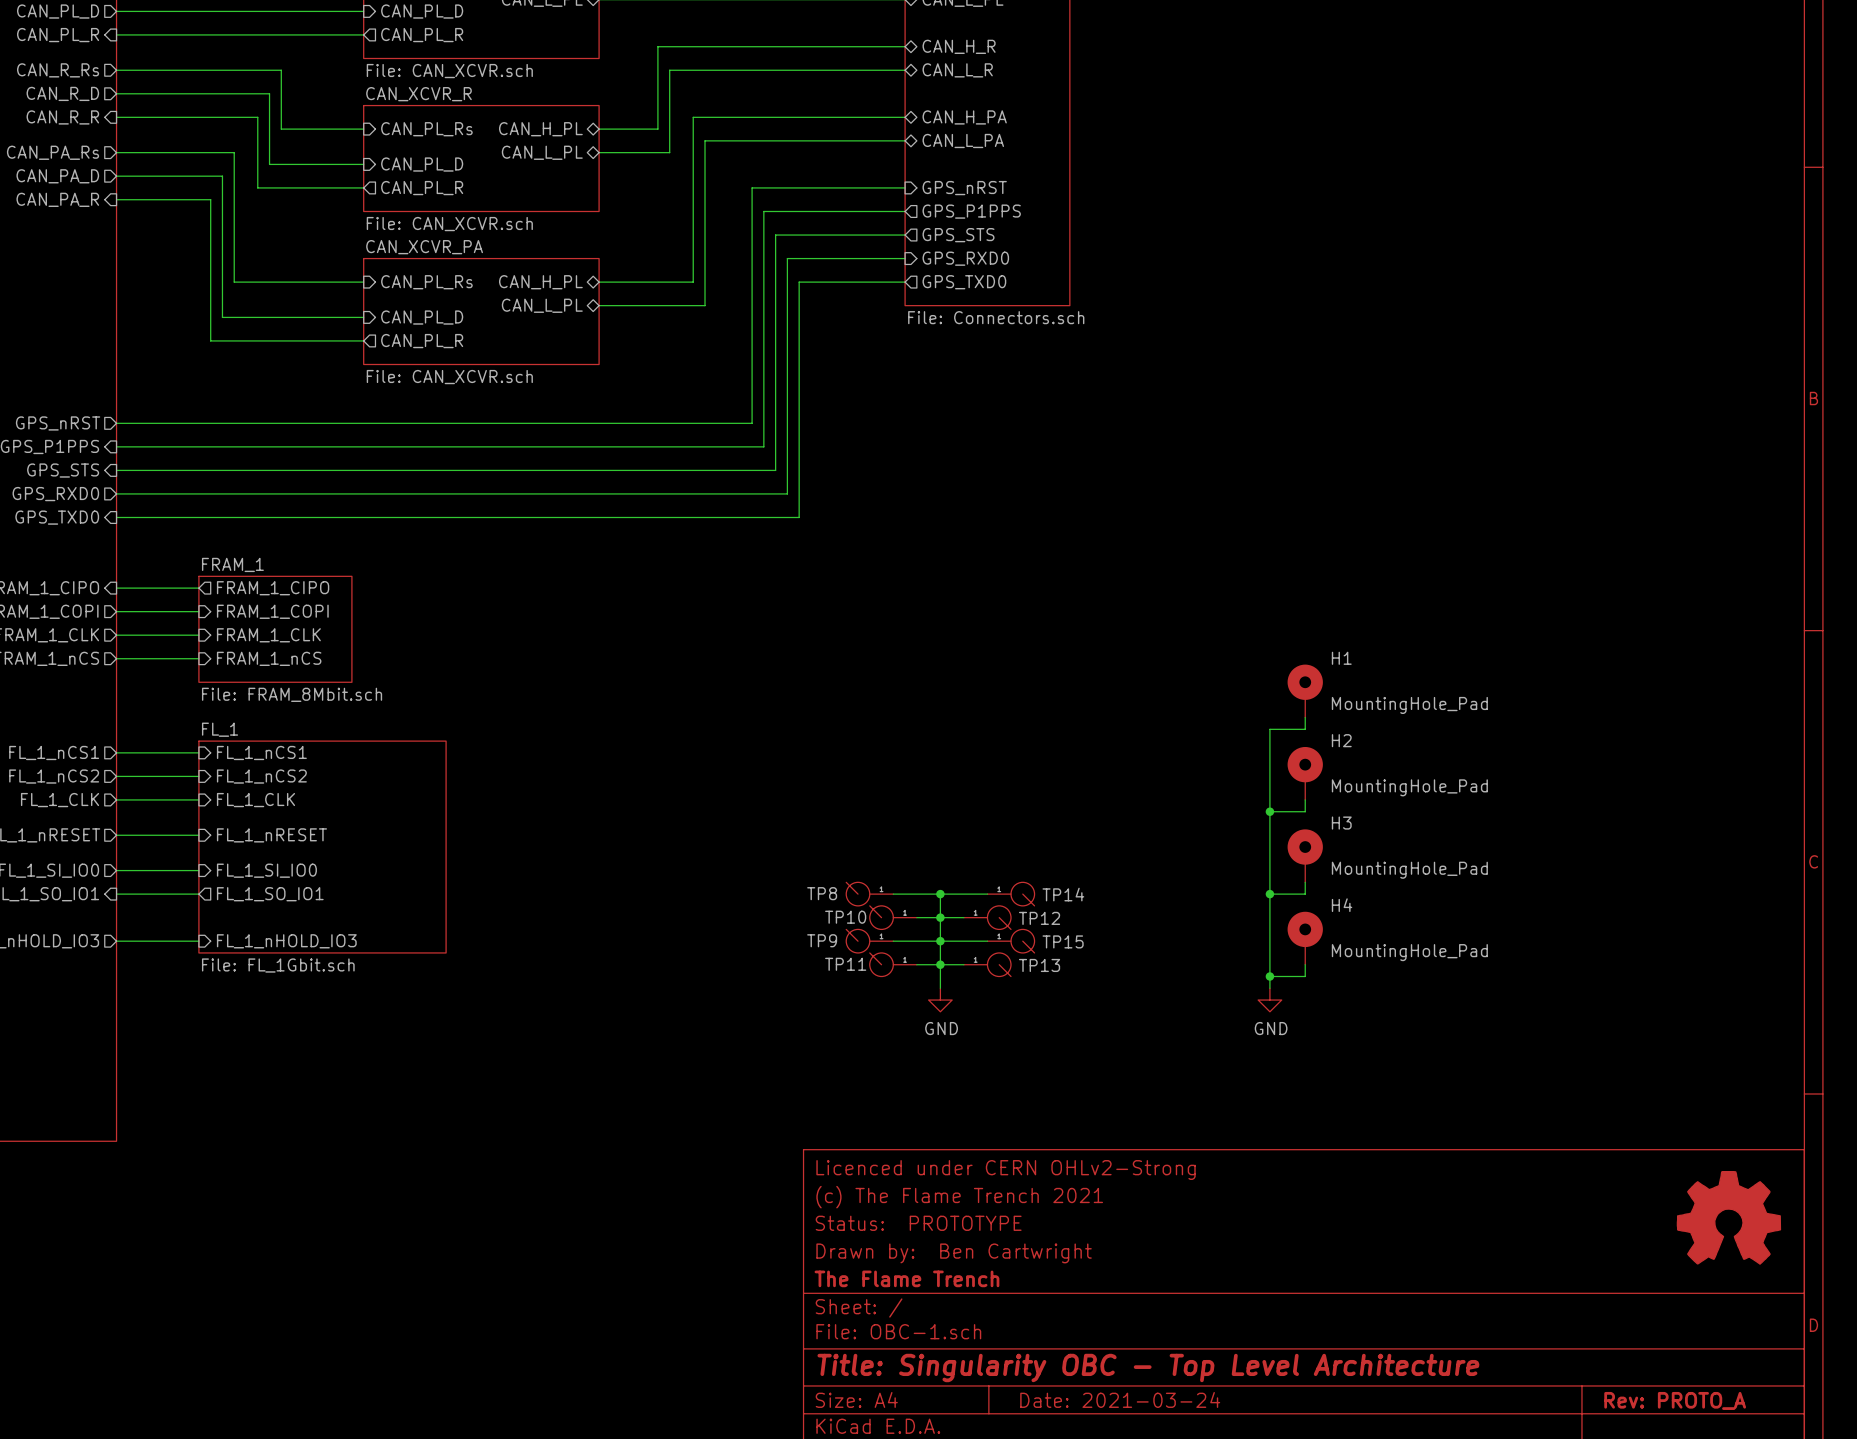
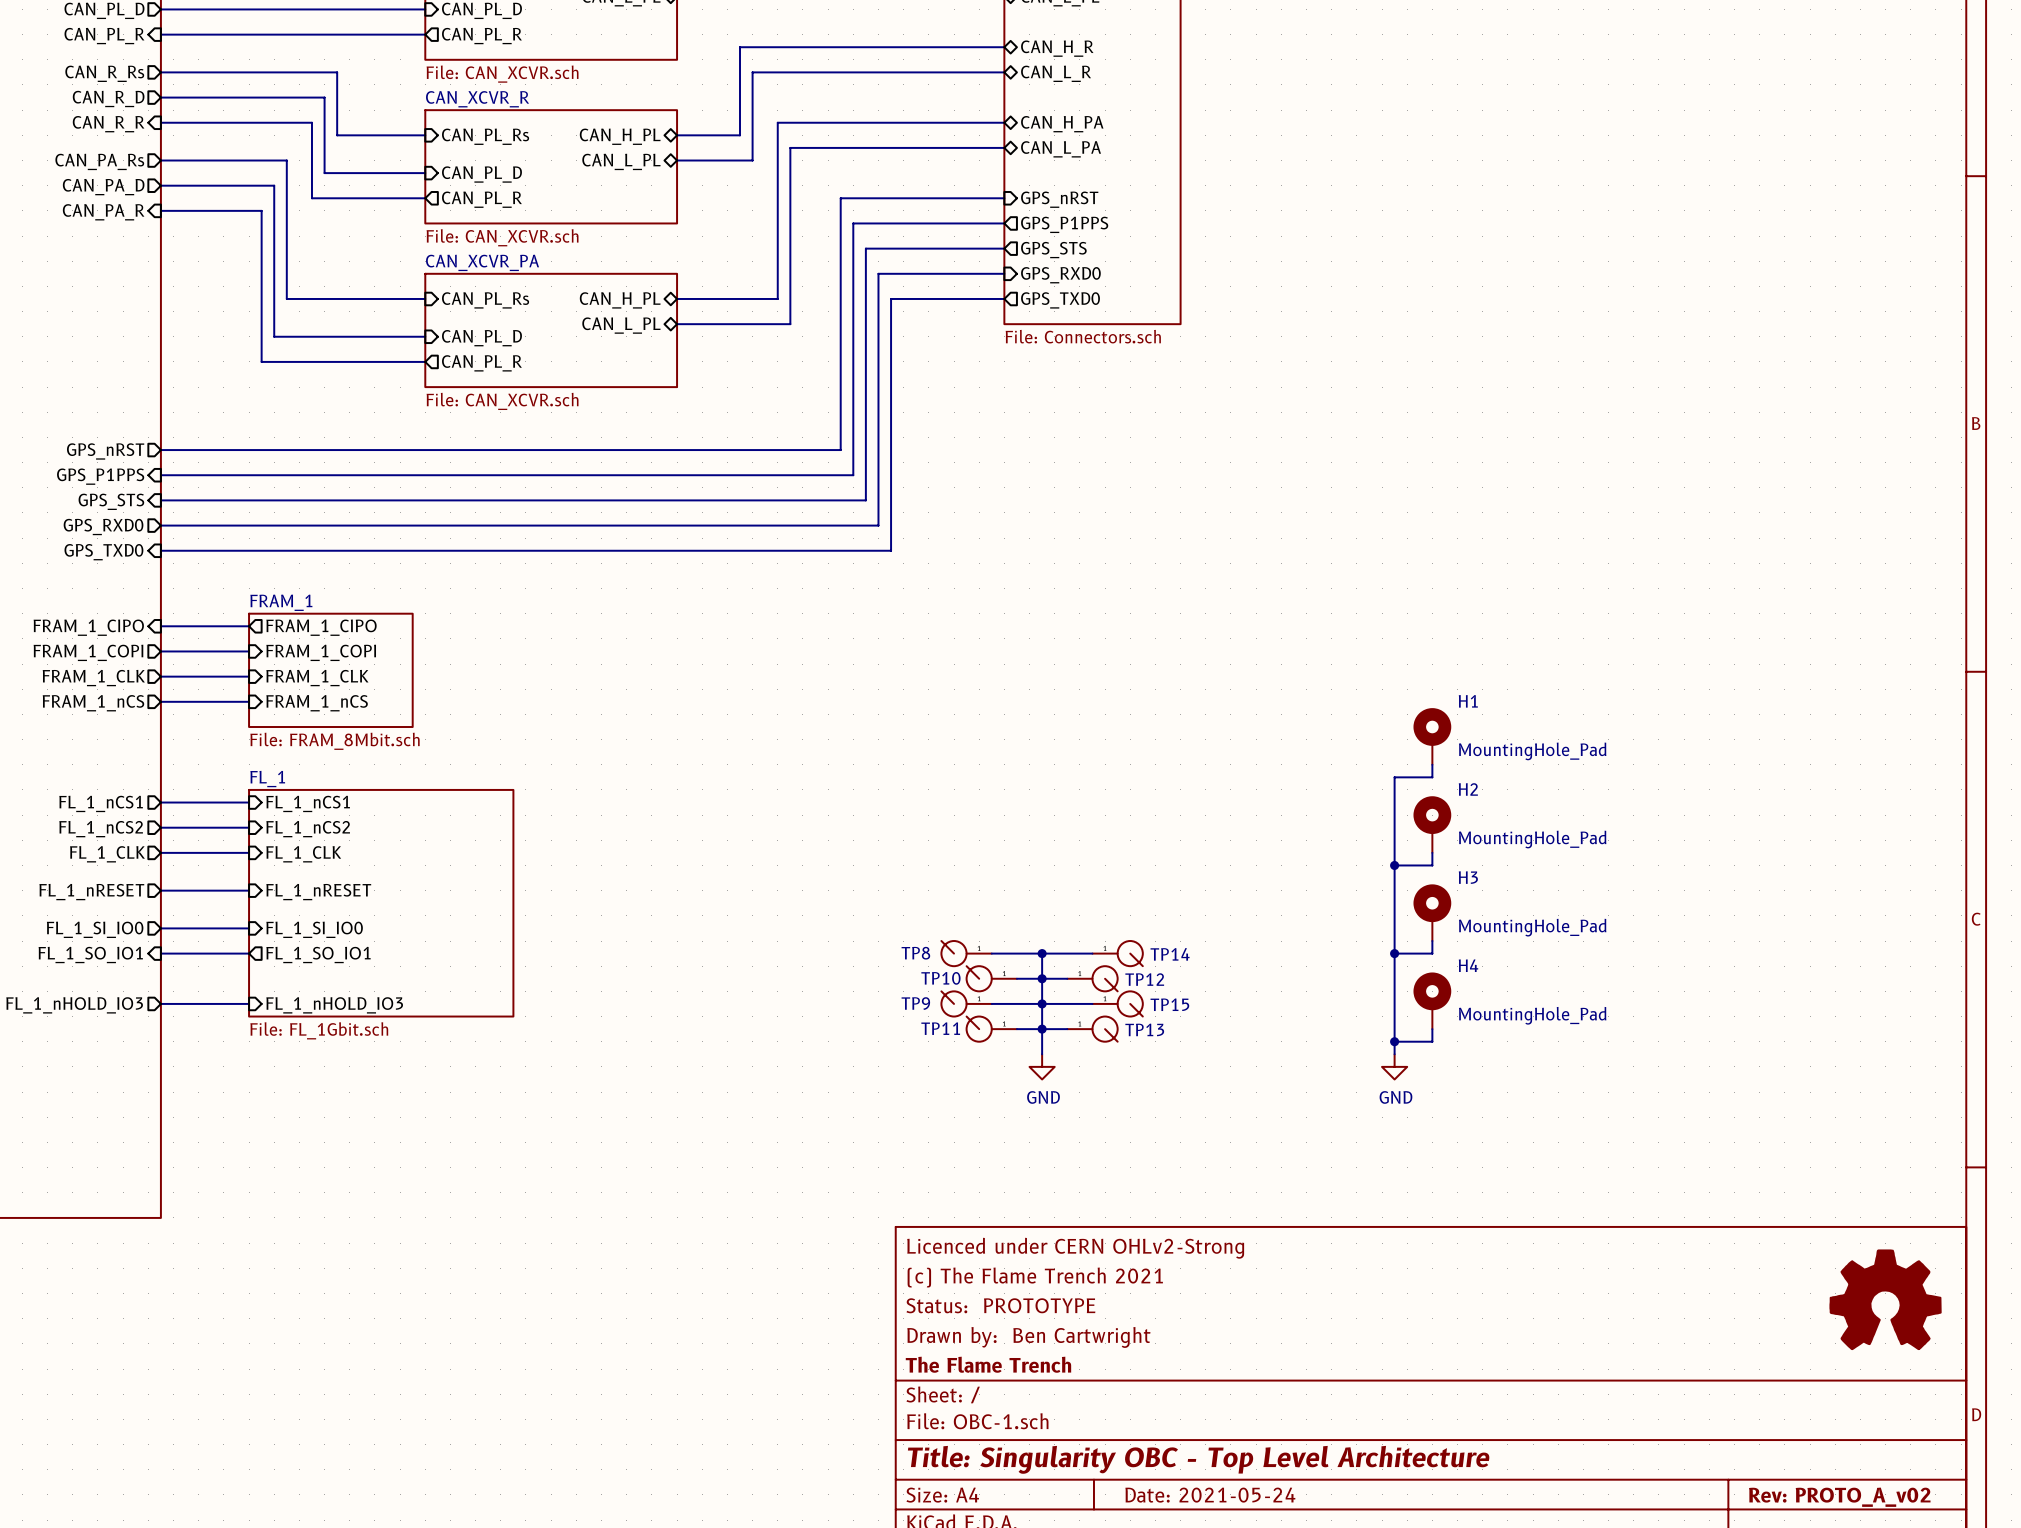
title block: Date: 2021-03-24 (1120, 1399) -> Date: 2021-05-24 (1210, 1495)
title block: Rev: PROTO_A (1675, 1400) -> Rev: PROTO_A_v02 (1839, 1497)

